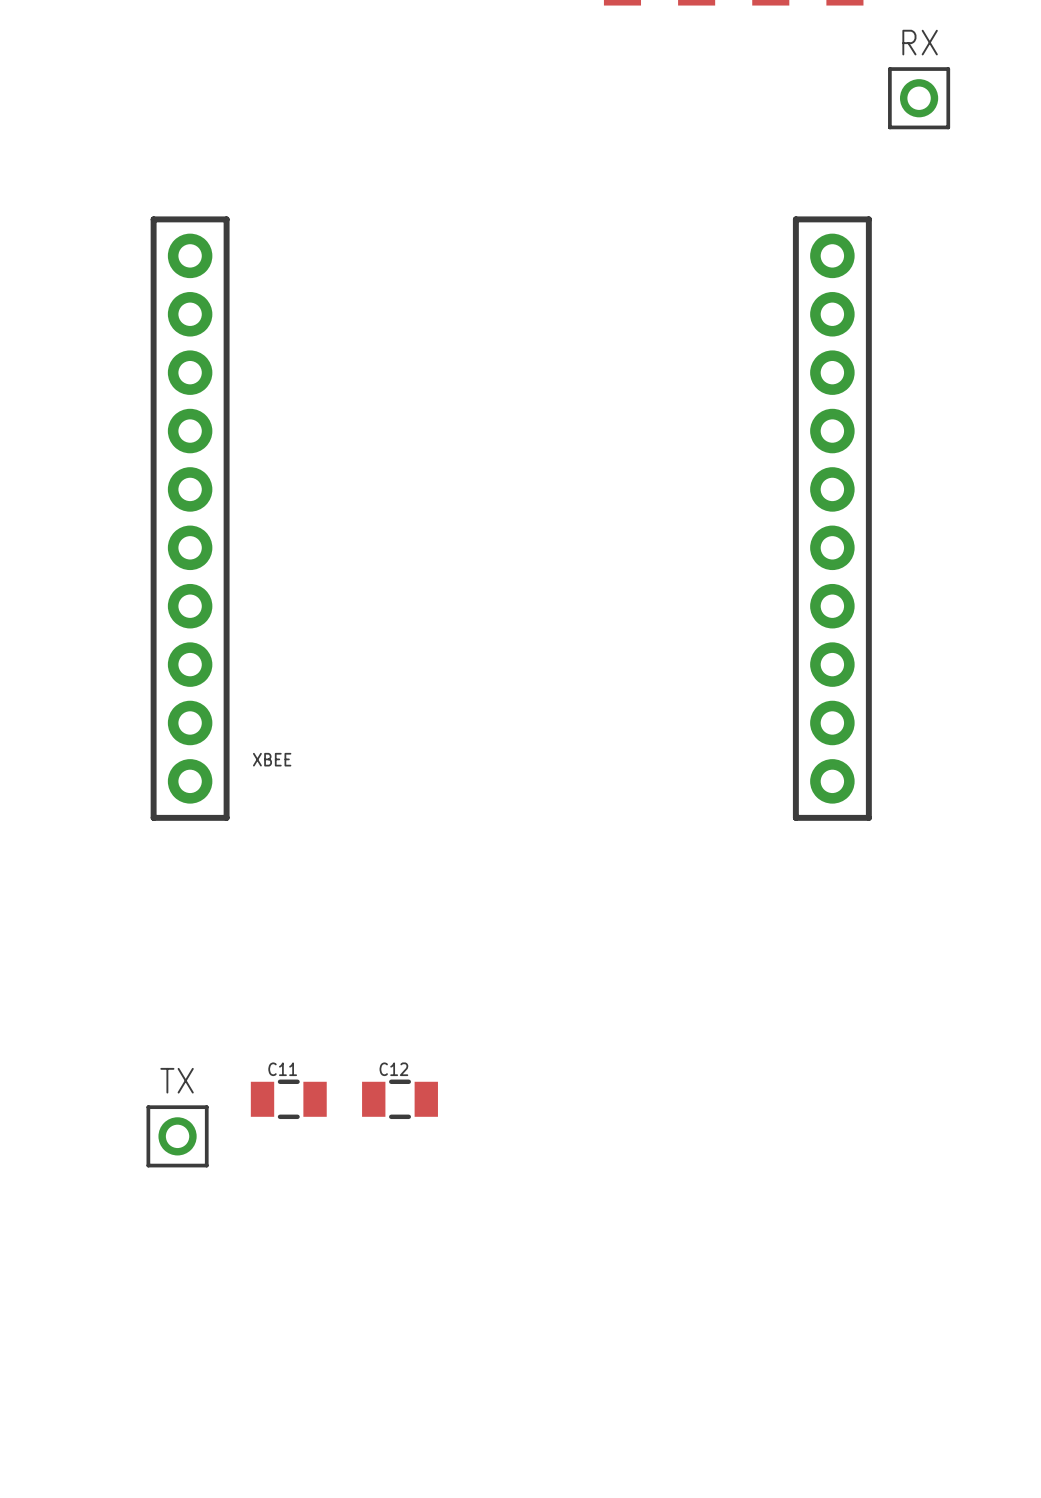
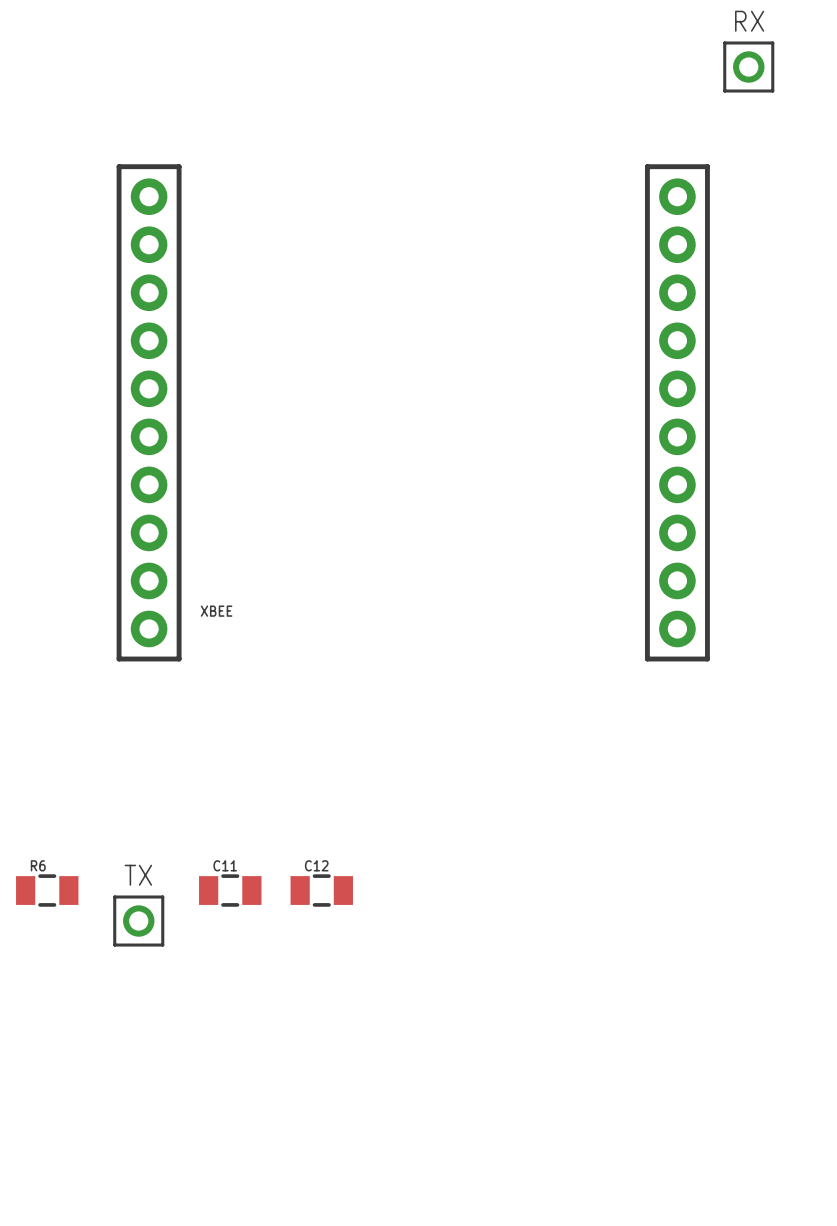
R6: none -> (47, 890)

